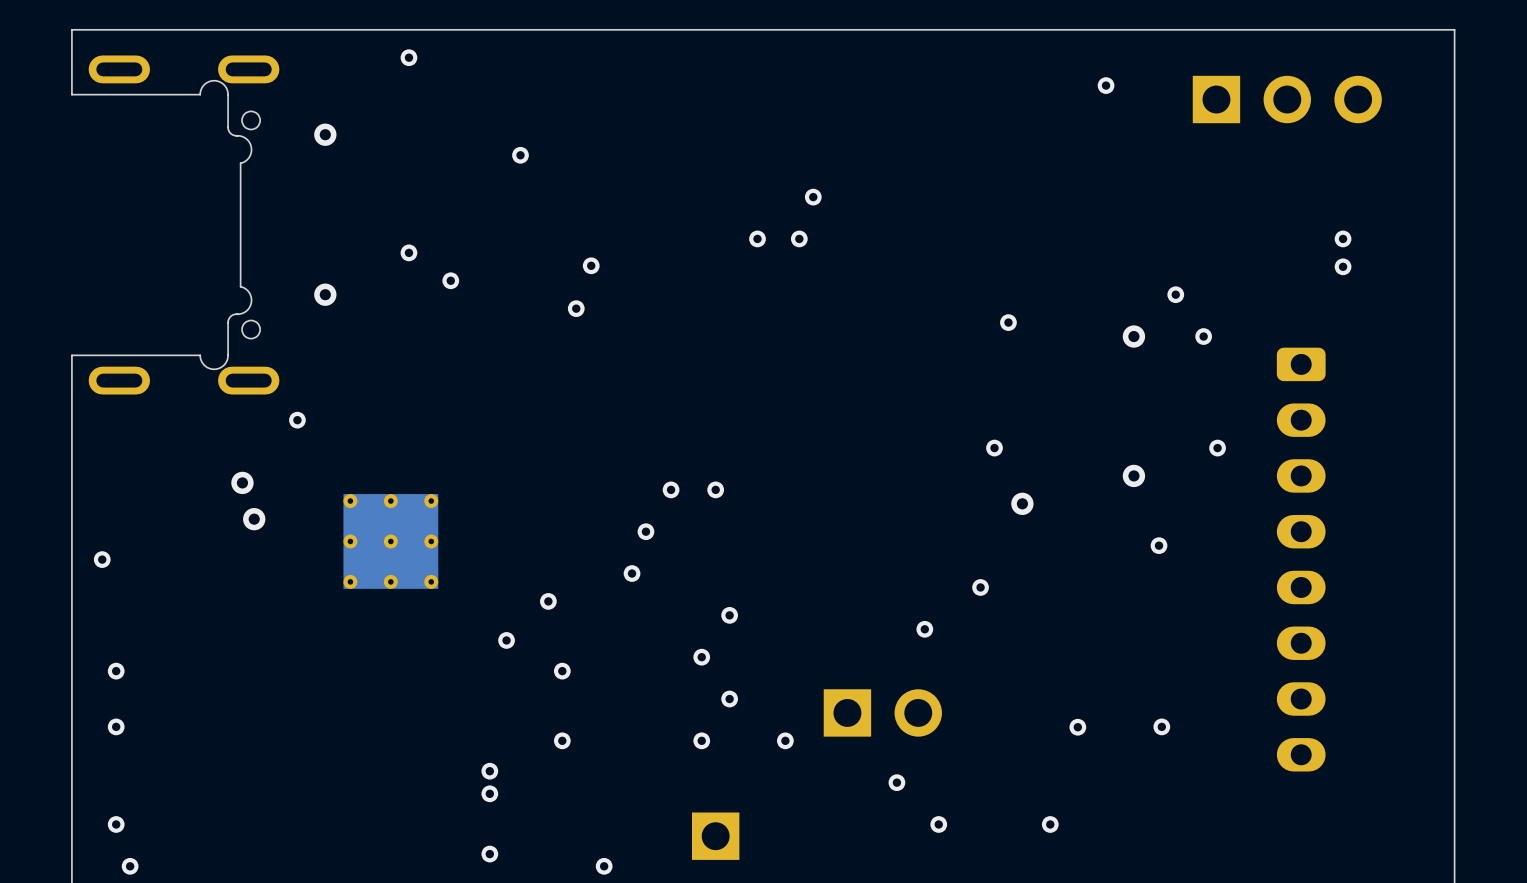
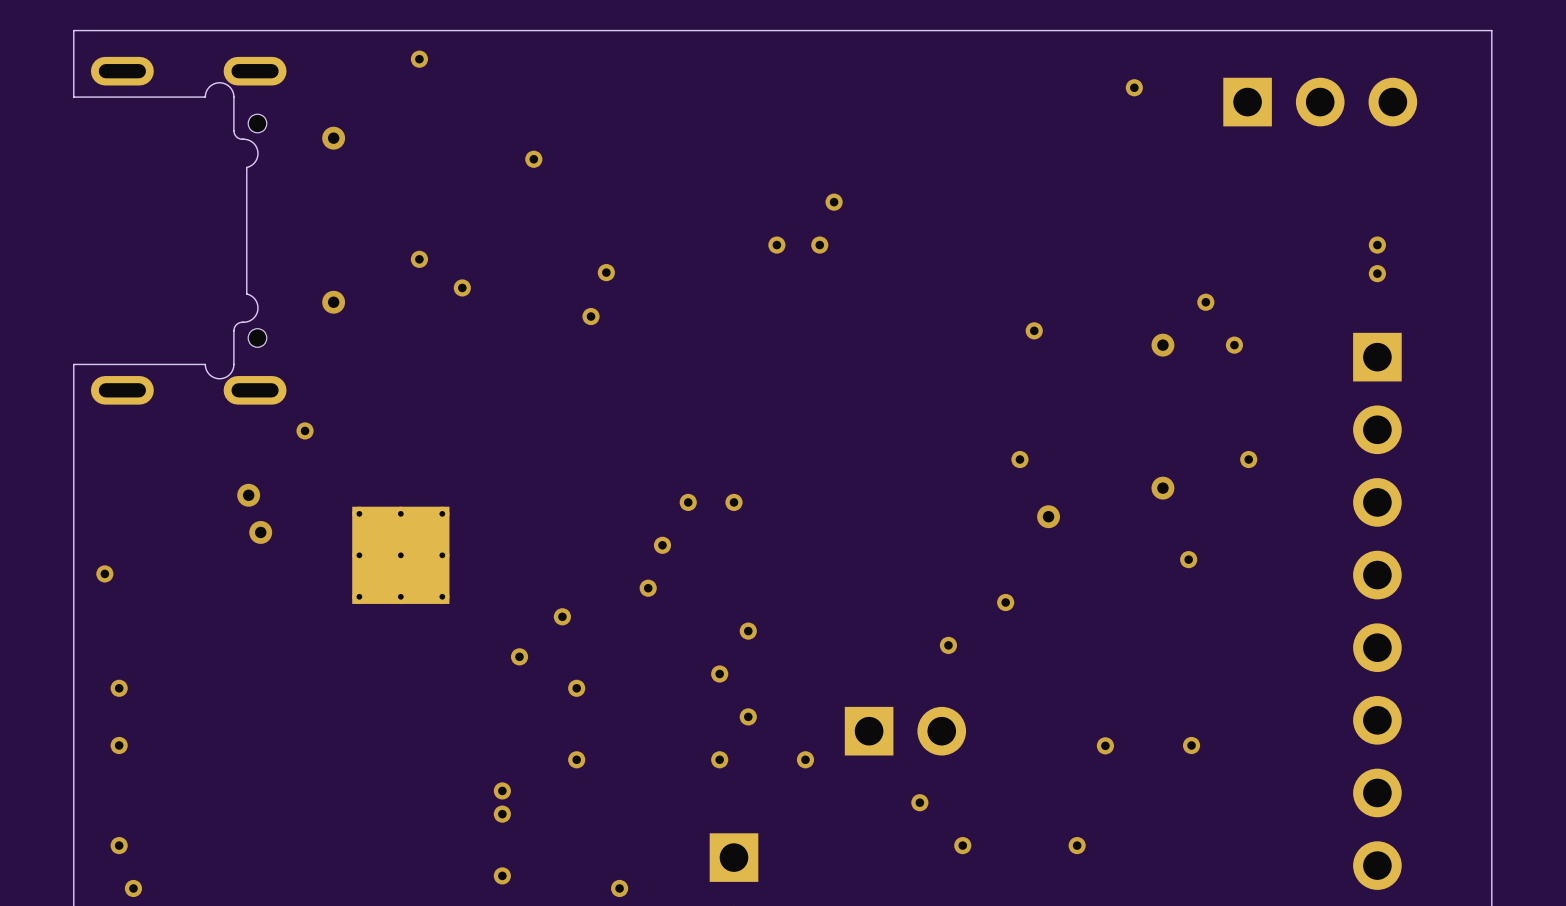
part: (1301, 559) -> none
part: none -> (1377, 611)

